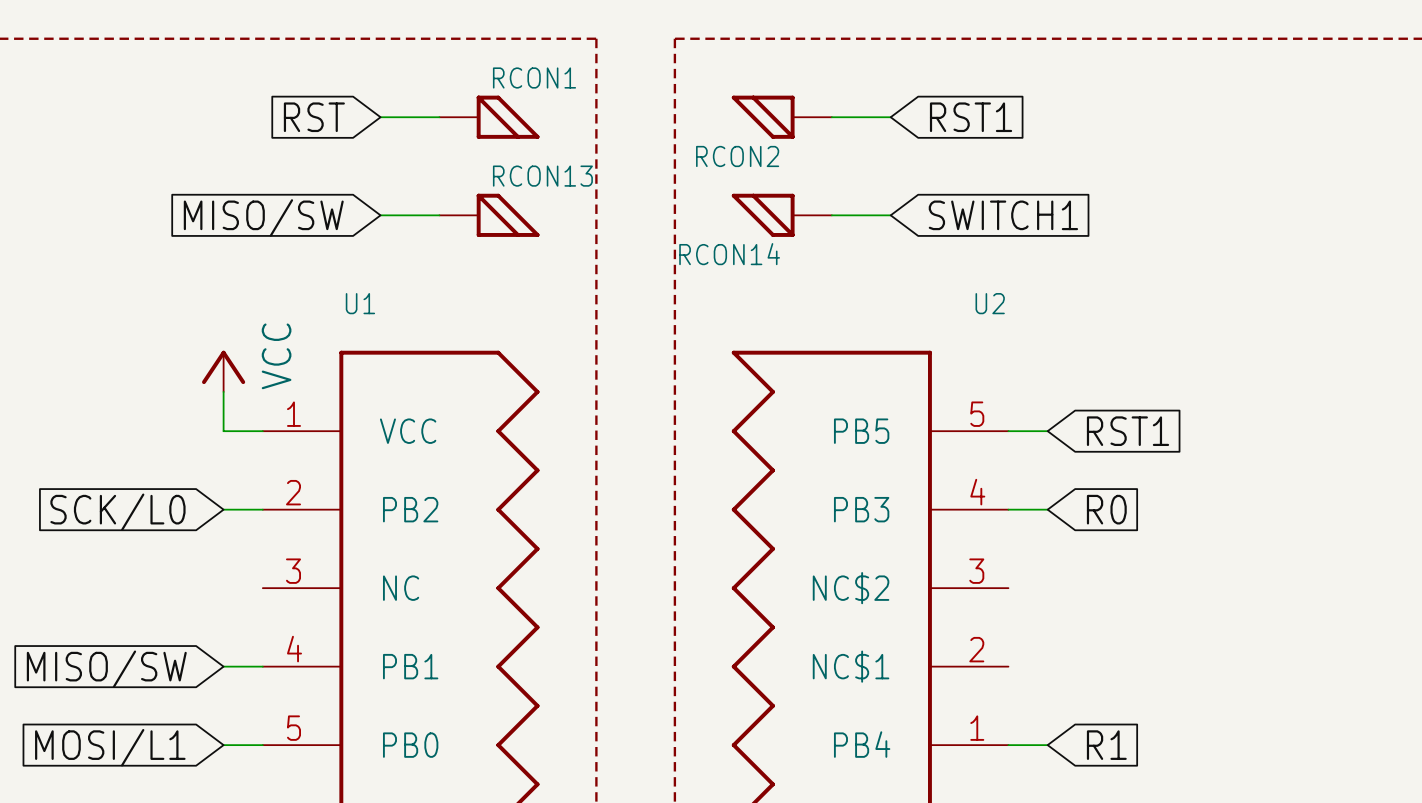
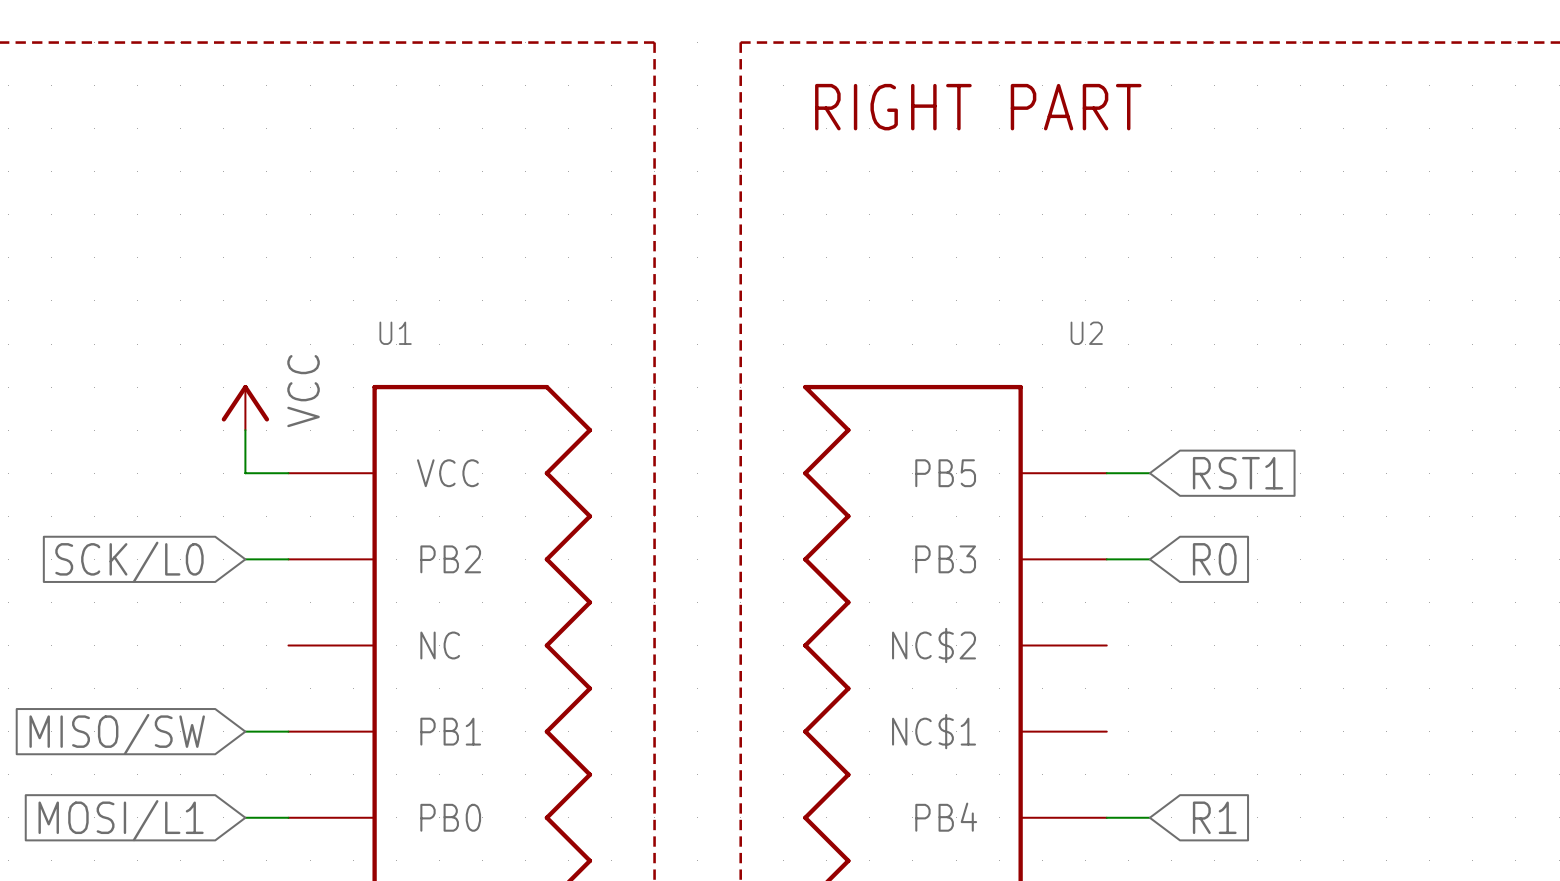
text: none -> RIGHT PART (978, 107)
global label: RST (314, 117) -> none
wire: (380, 117) (439, 117) -> none
RCON1: (489, 117) -> none
RCON2: (781, 117) -> none
wire: (831, 117) (890, 117) -> none
global label: RST1 (971, 117) -> none
wire: (380, 215) (439, 215) -> none
RCON13: (489, 215) -> none
RCON14: (781, 215) -> none
wire: (831, 215) (890, 215) -> none
global label: SWITCH1 (1003, 215) -> none
global label: MISO/SW (263, 217) -> none
U1 pin number: 1 (294, 414) -> none
U2 pin number: 5 (977, 414) -> none
U1 pin number: 2 (293, 492) -> none
U2 pin number: 4 (977, 492) -> none
U1 pin number: 3 (293, 571) -> none
U2 pin number: 3 (976, 571) -> none
U1 pin number: 4 (294, 649) -> none
U2 pin number: 2 (976, 649) -> none
U1 pin number: 5 (294, 728) -> none
U2 pin number: 1 (977, 728) -> none

